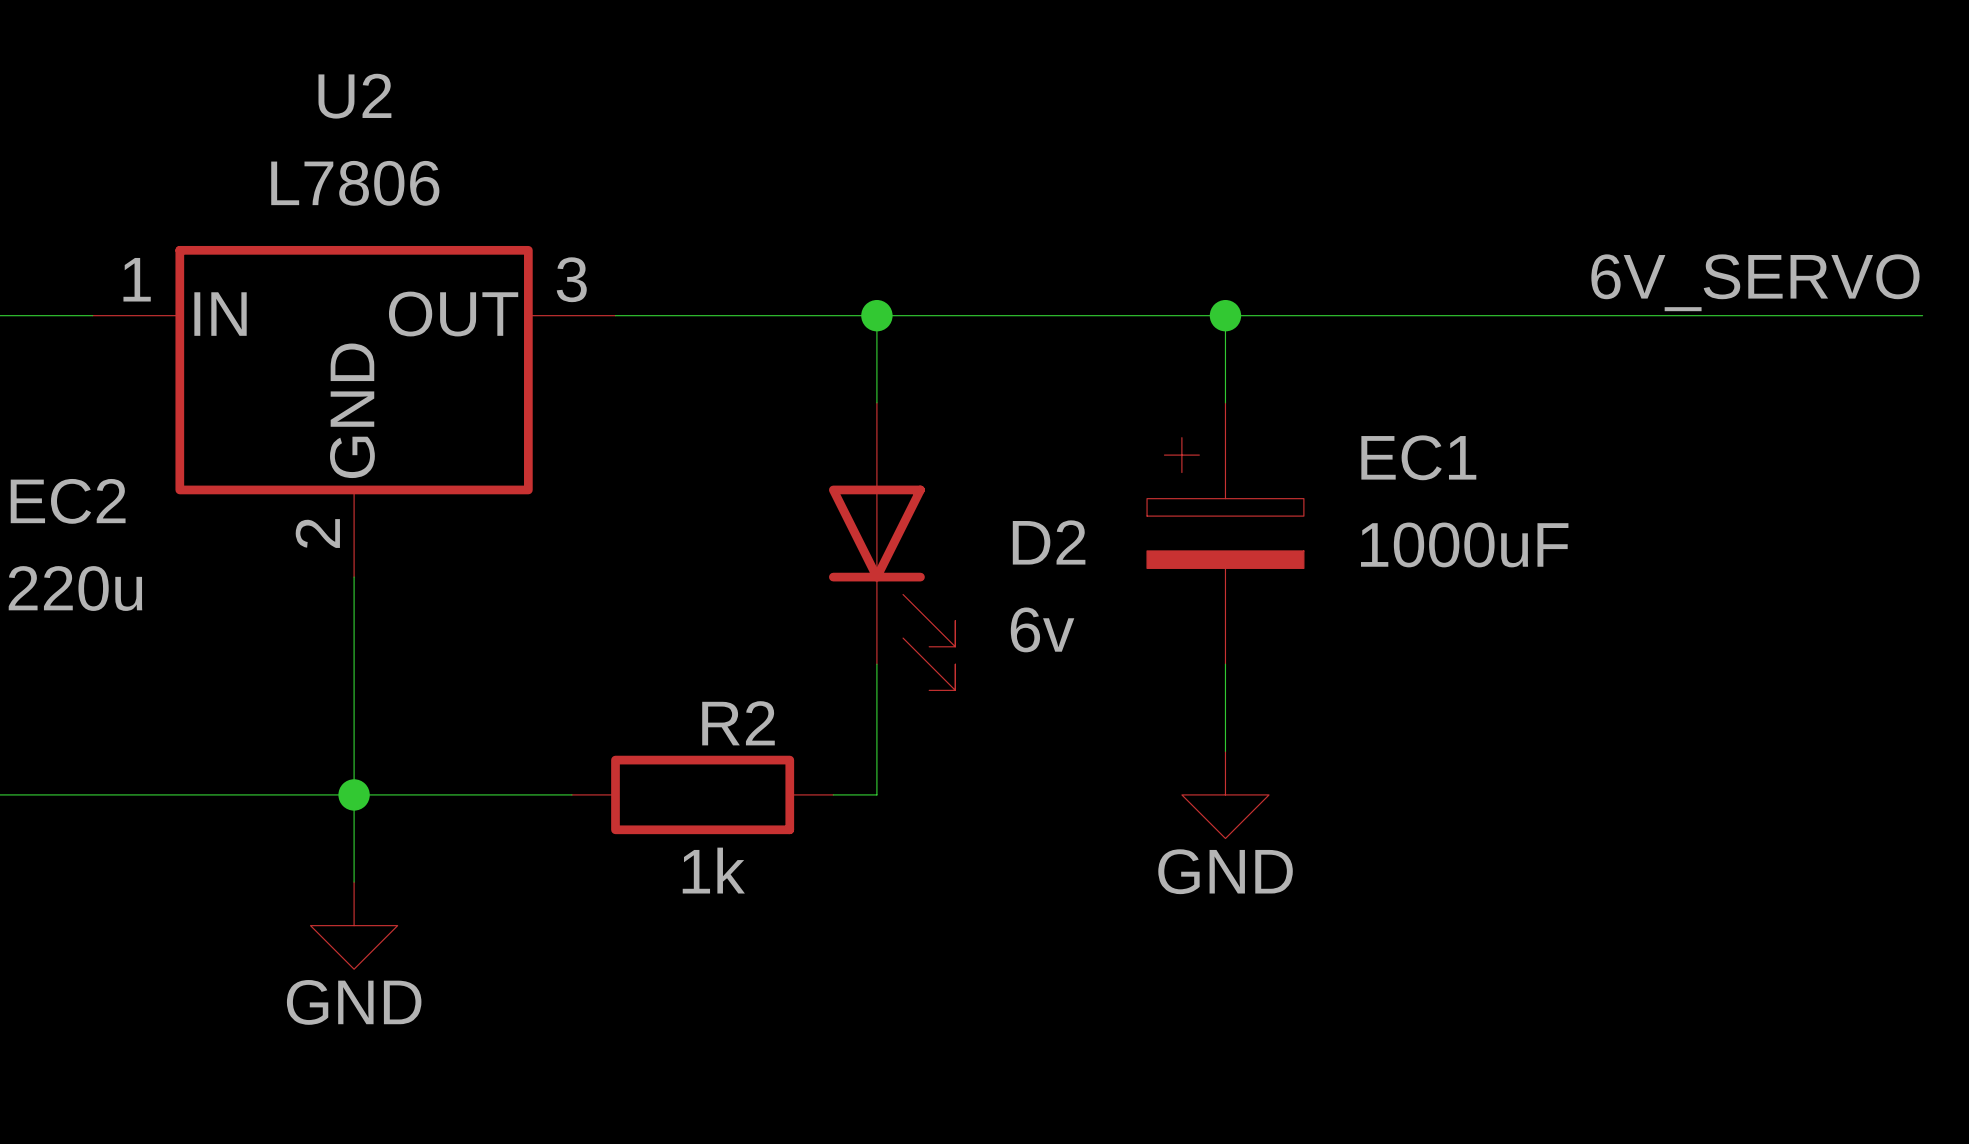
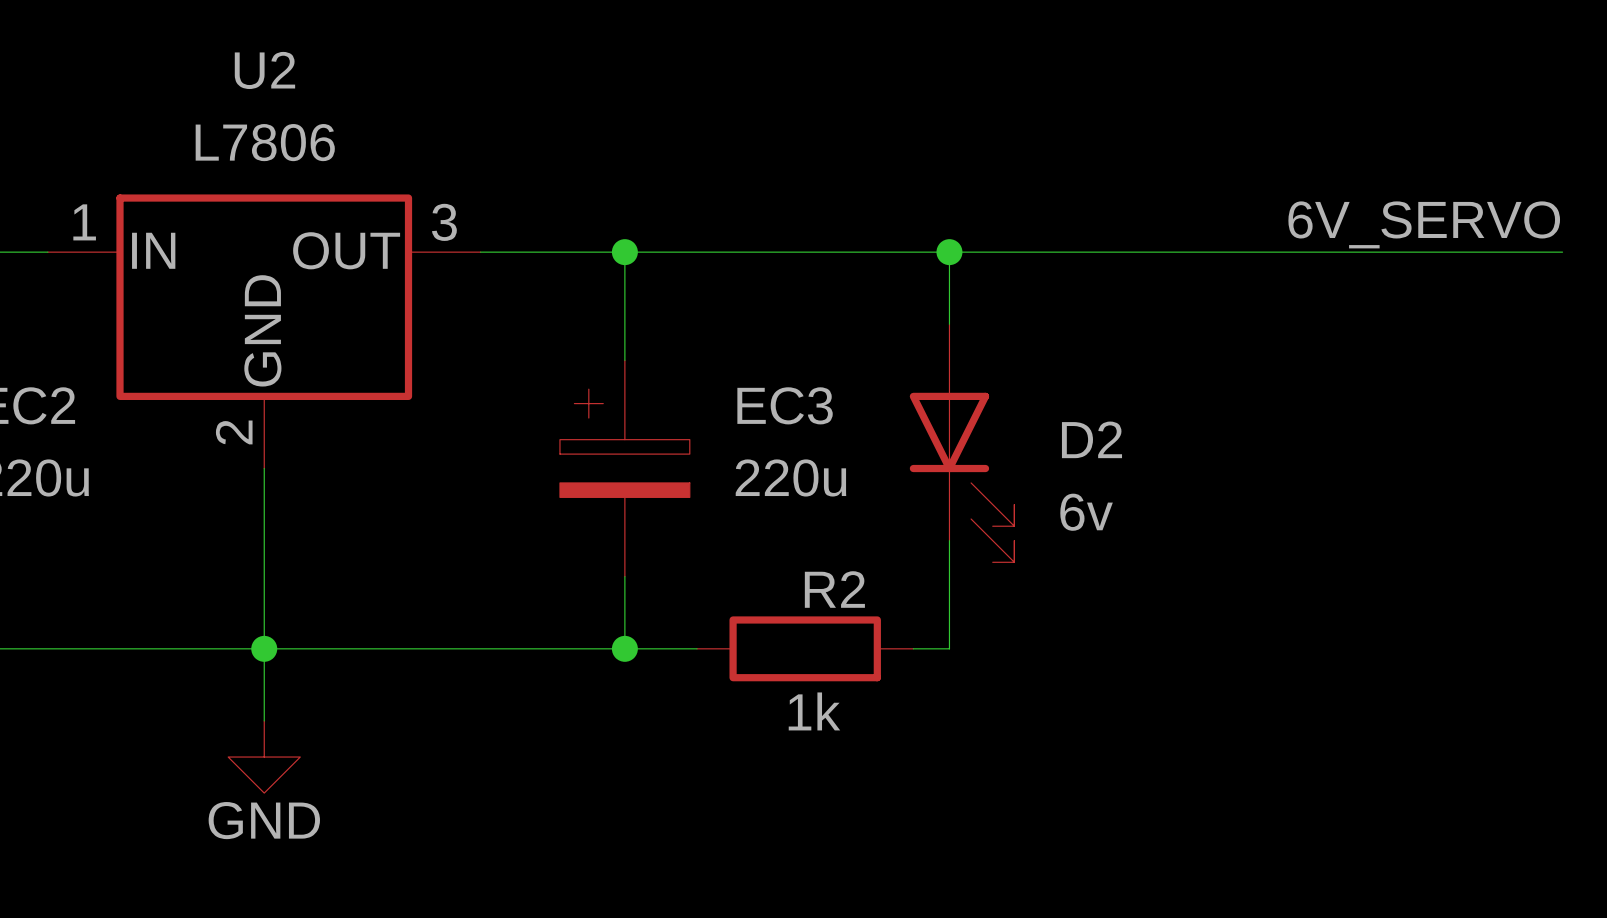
wire: (876, 315) (876, 402) -> (624, 576) (624, 648)
junction position: (876, 315) -> (624, 252)
wire: (1225, 315) (1225, 402) -> (949, 252) (949, 324)
junction position: (1225, 315) -> (949, 252)
EC1: 1000uF (1225, 533) -> none
D2 position: (892, 546) -> (962, 443)
EC3: none -> 220u (624, 468)
wire: (876, 664) (876, 794) -> (624, 252) (624, 360)
wire: none -> (949, 540) (949, 648) (913, 648)
wire: (1225, 664) (1225, 751) -> none
wire: none -> (444, 648) (660, 648)
R2 position: (702, 794) -> (805, 648)
junction: none -> (624, 648)
power symbol: GND (1225, 794) -> none

